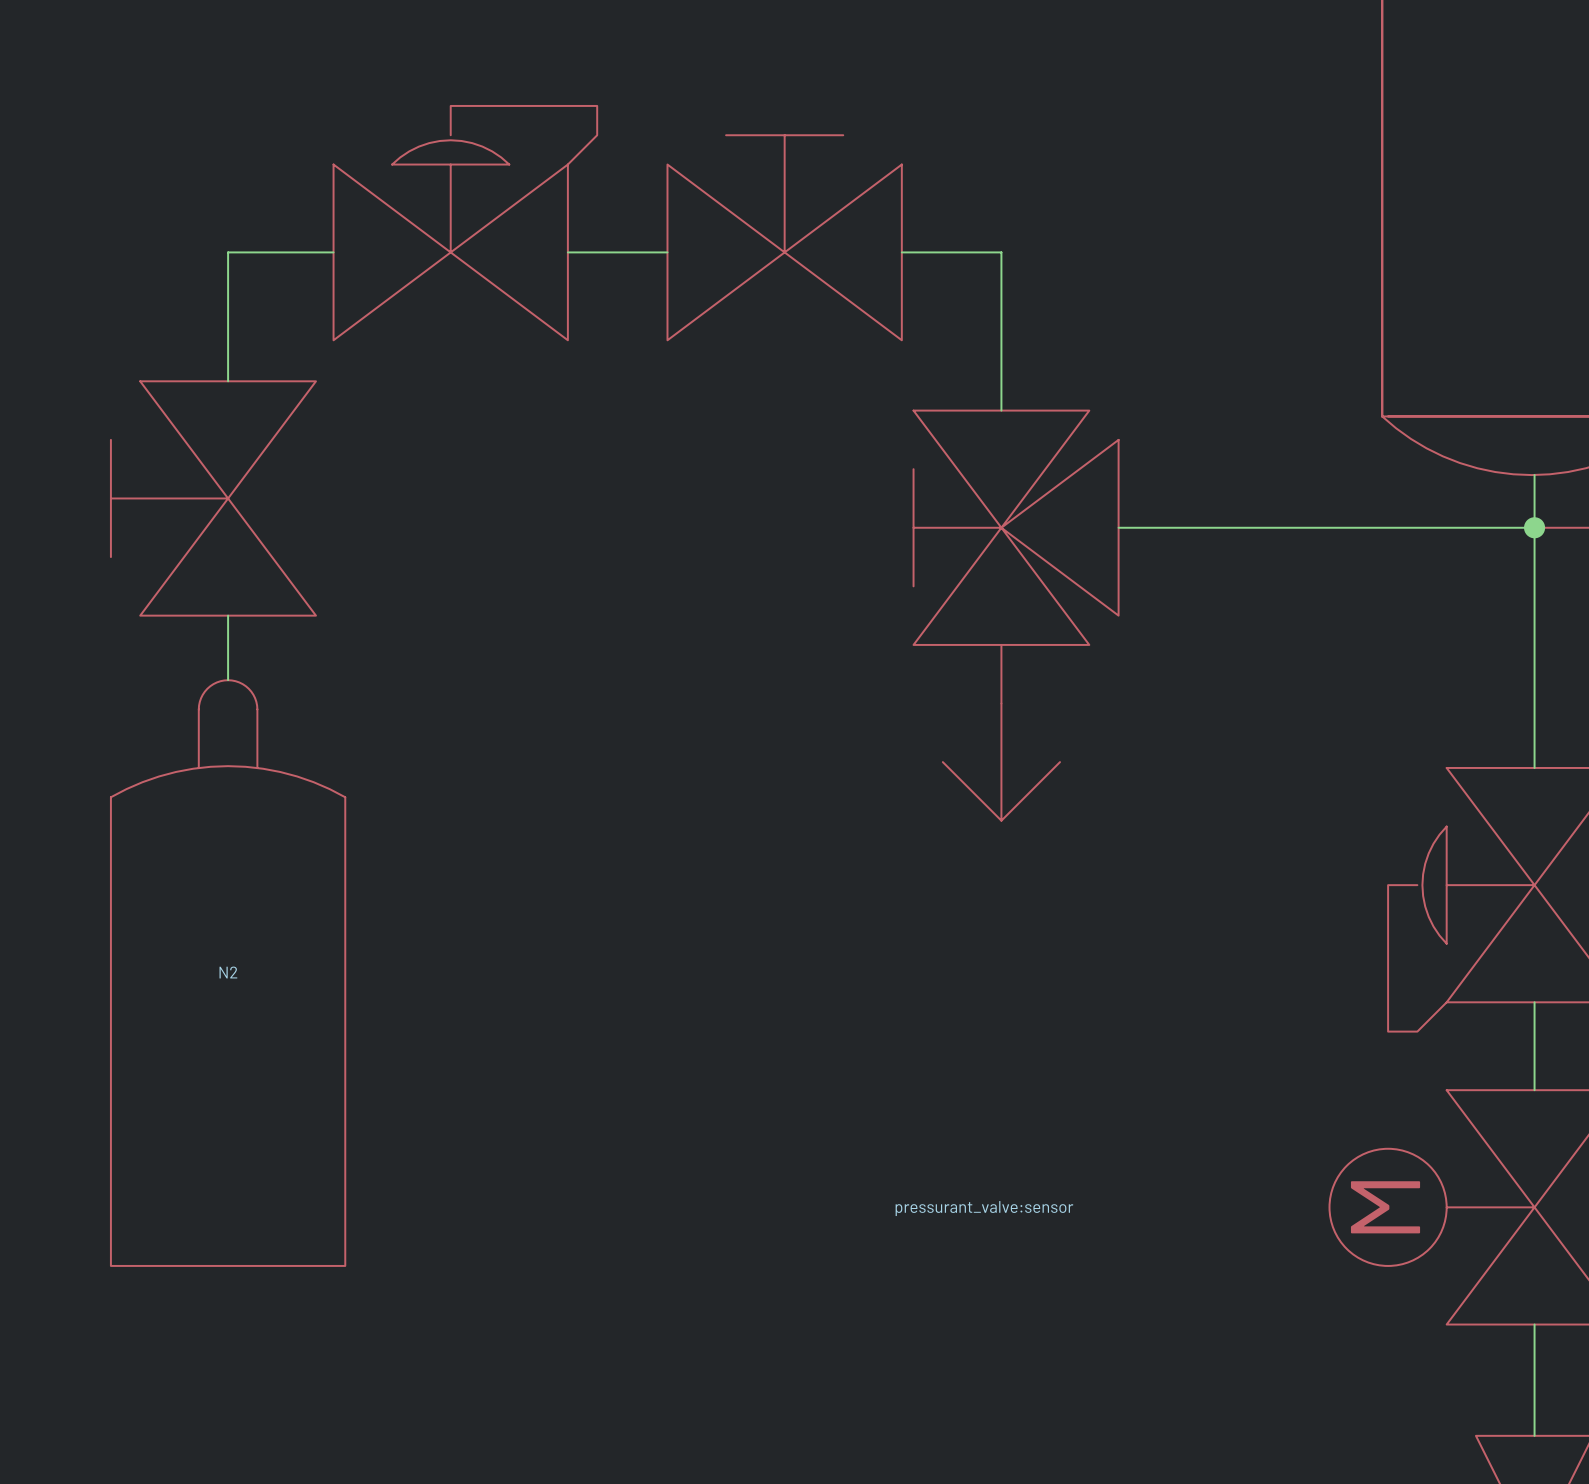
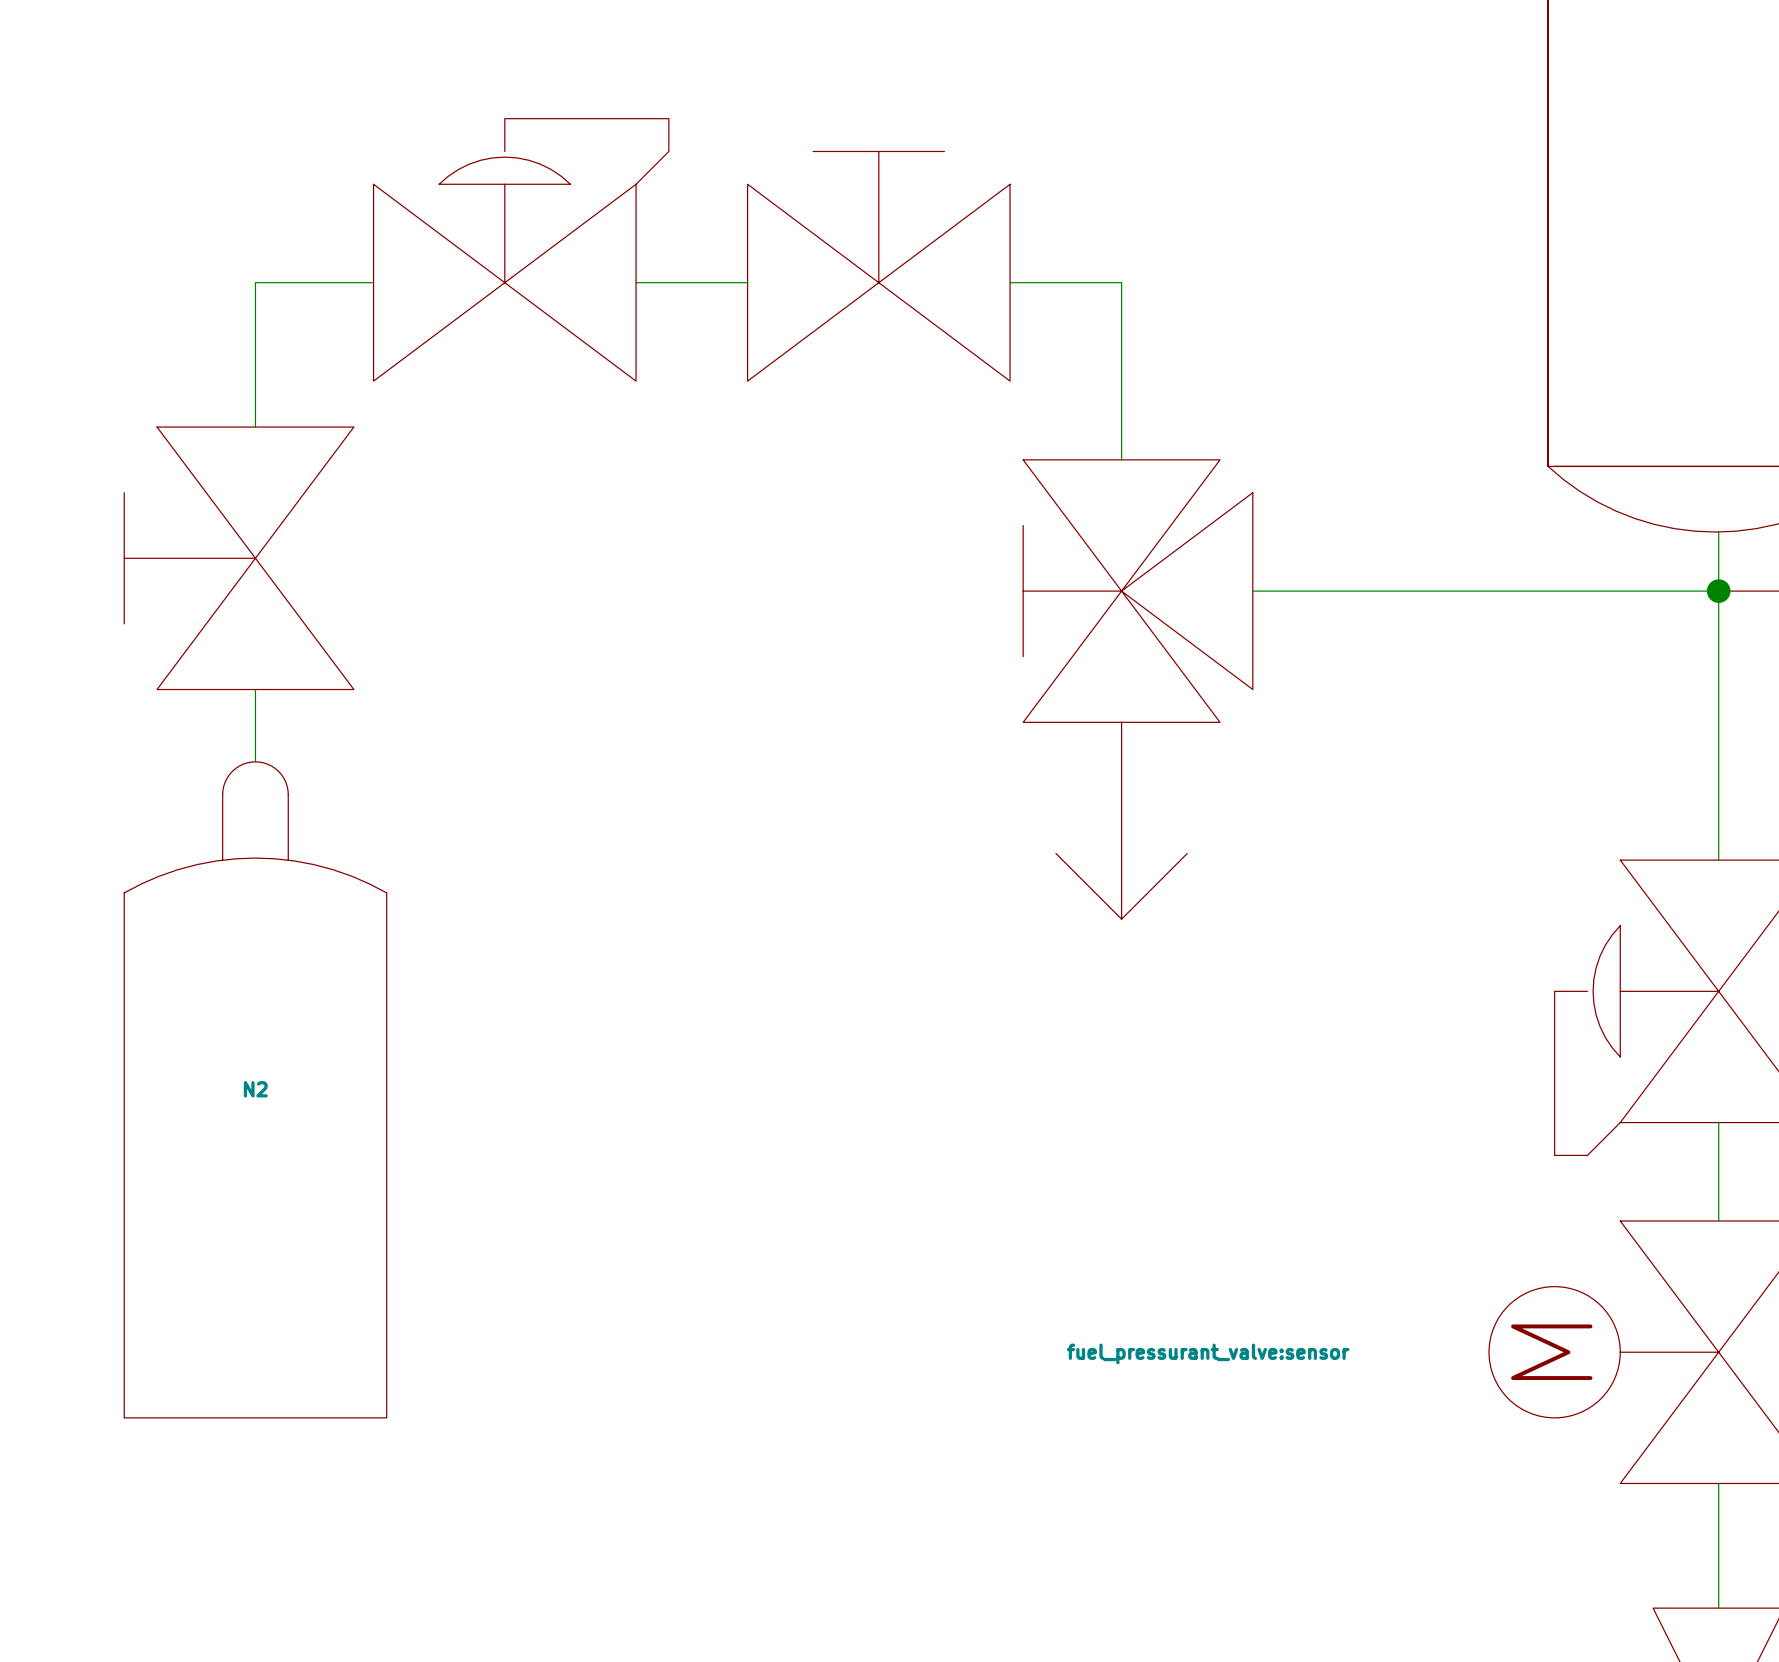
part value: pressurant_valve:sensor (984, 1208) -> fuel_pressurant_valve:sensor (1208, 1353)

